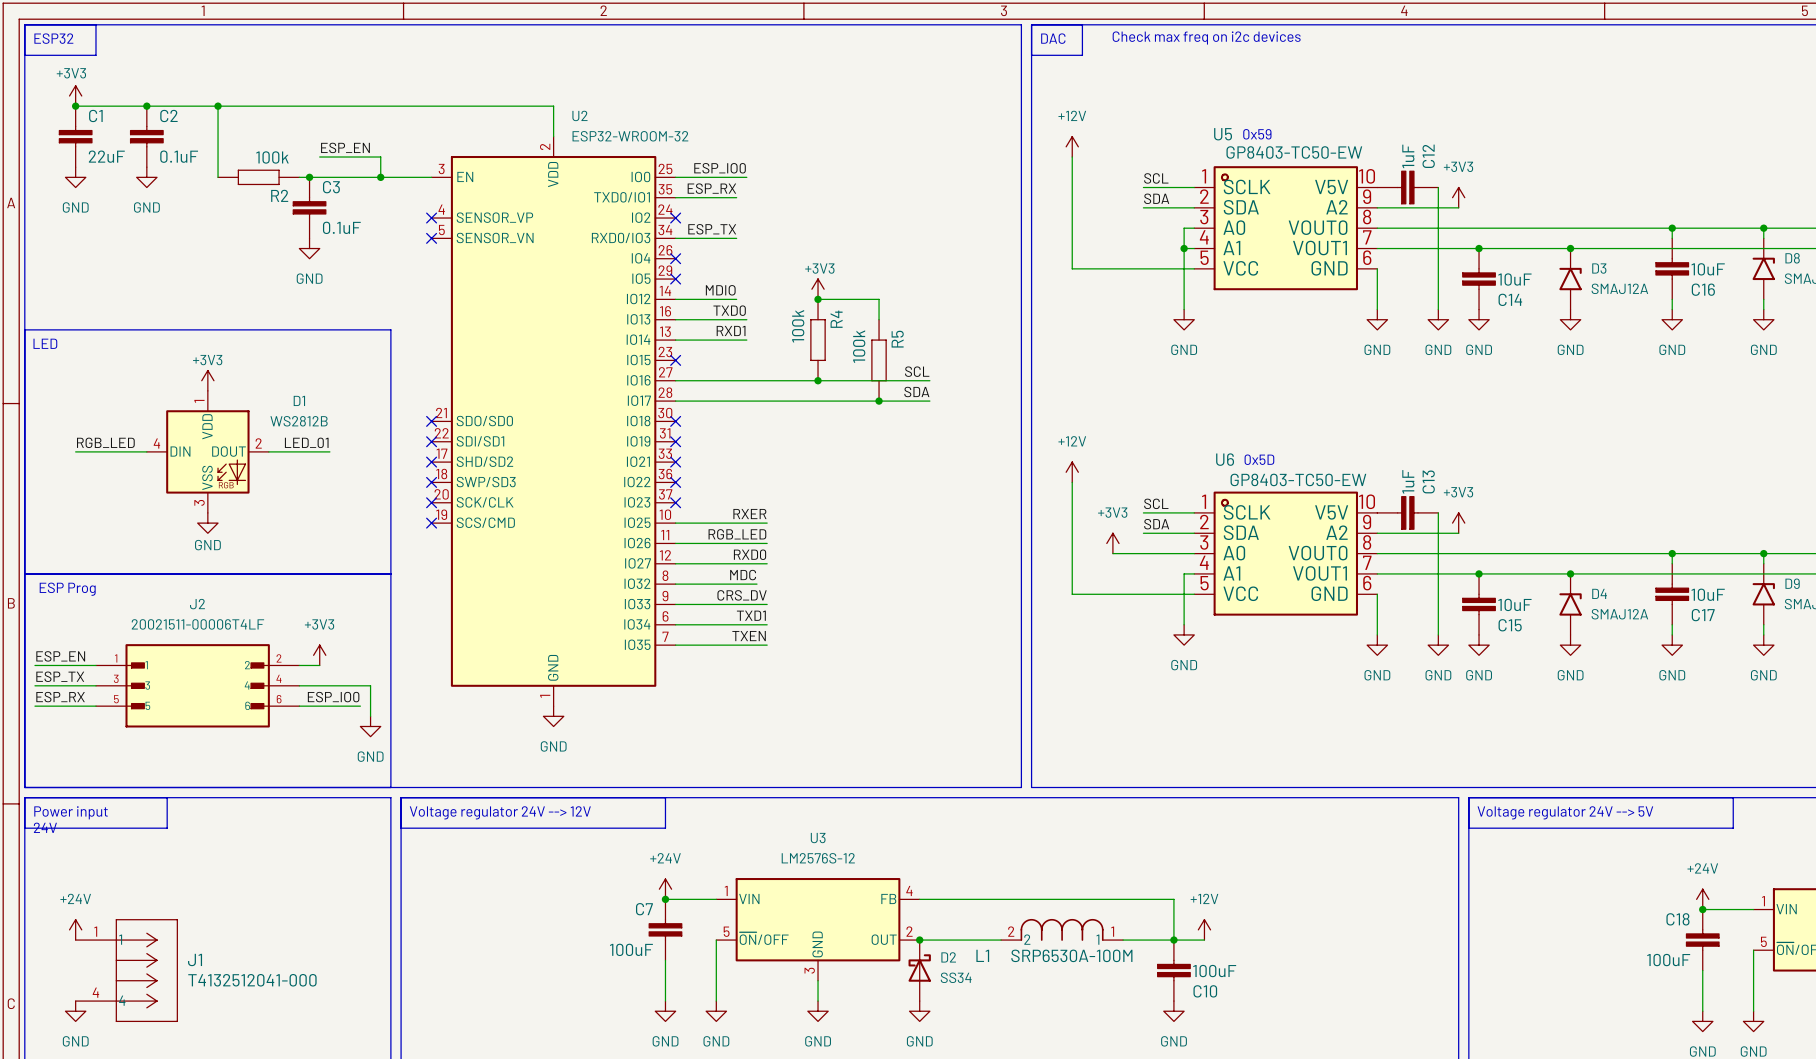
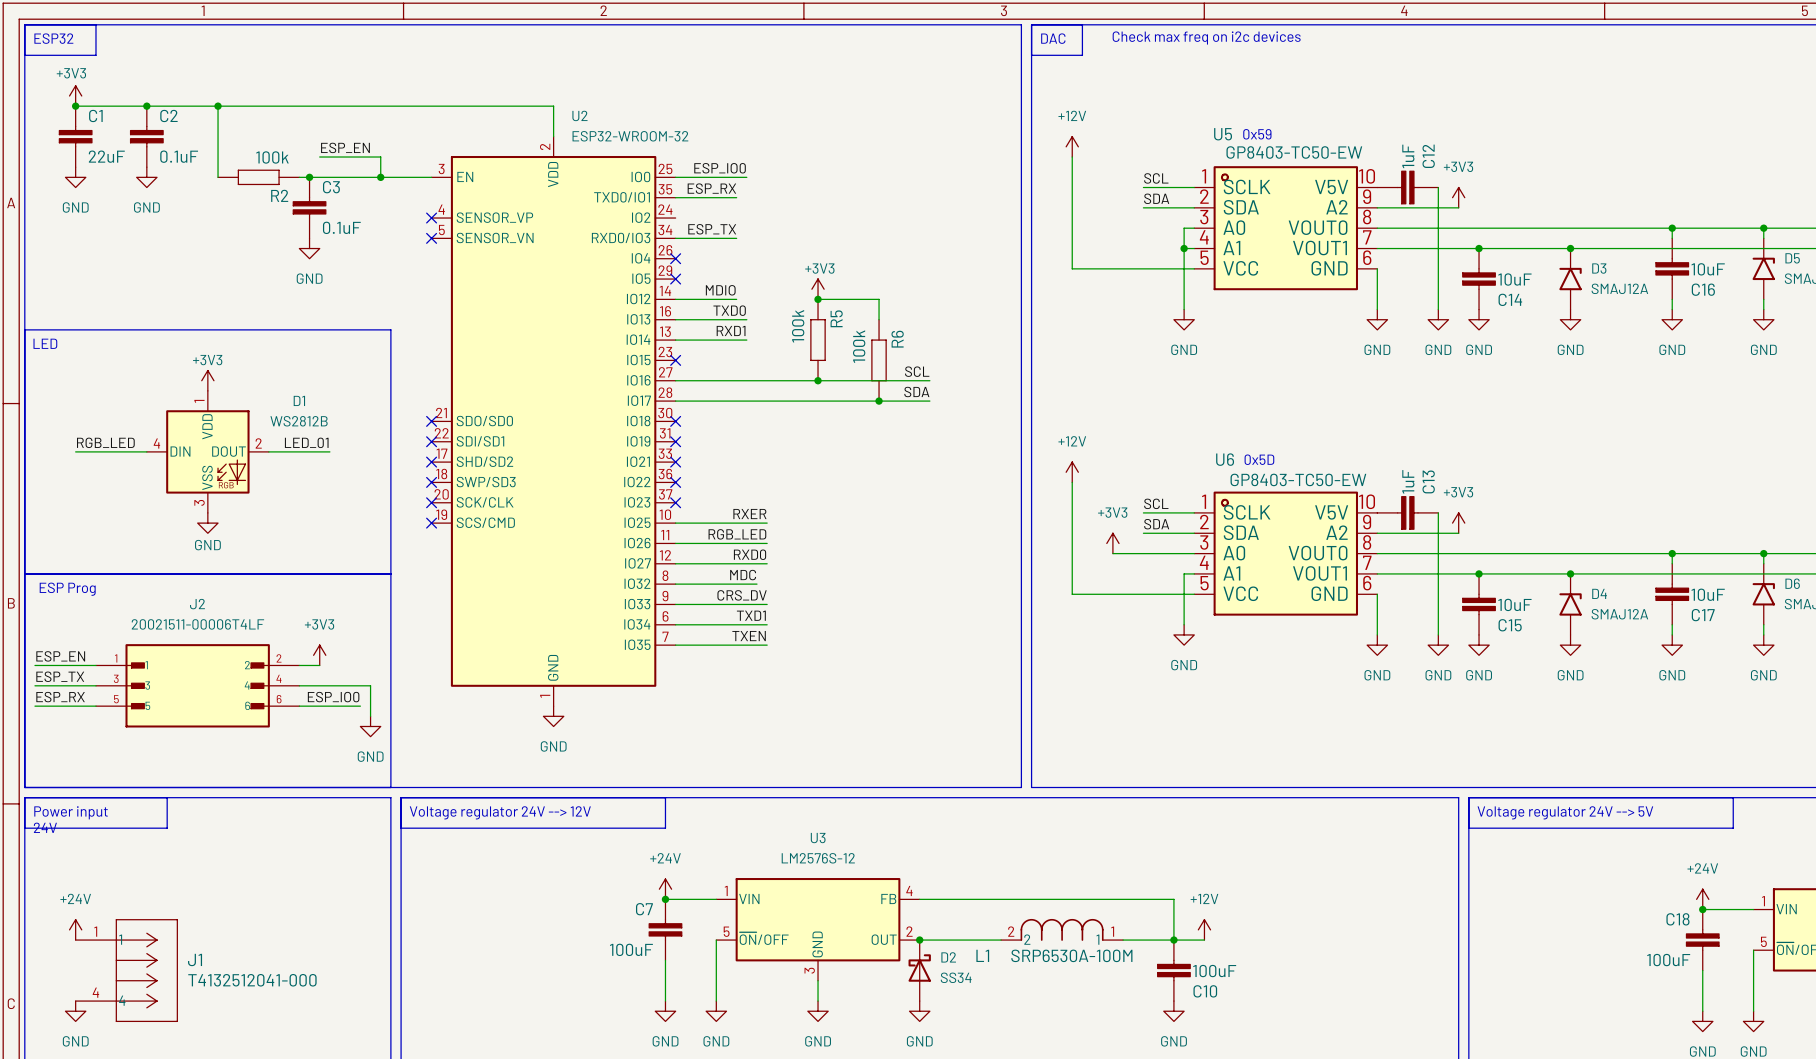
no-connect mark: (675, 218) -> none
D8 name: D8 (1792, 258) -> D5 (1792, 258)
R4 name: R4 (836, 319) -> R5 (836, 318)
R5 name: R5 (897, 339) -> R6 (897, 339)
D9 name: D9 (1792, 583) -> D6 (1792, 583)

